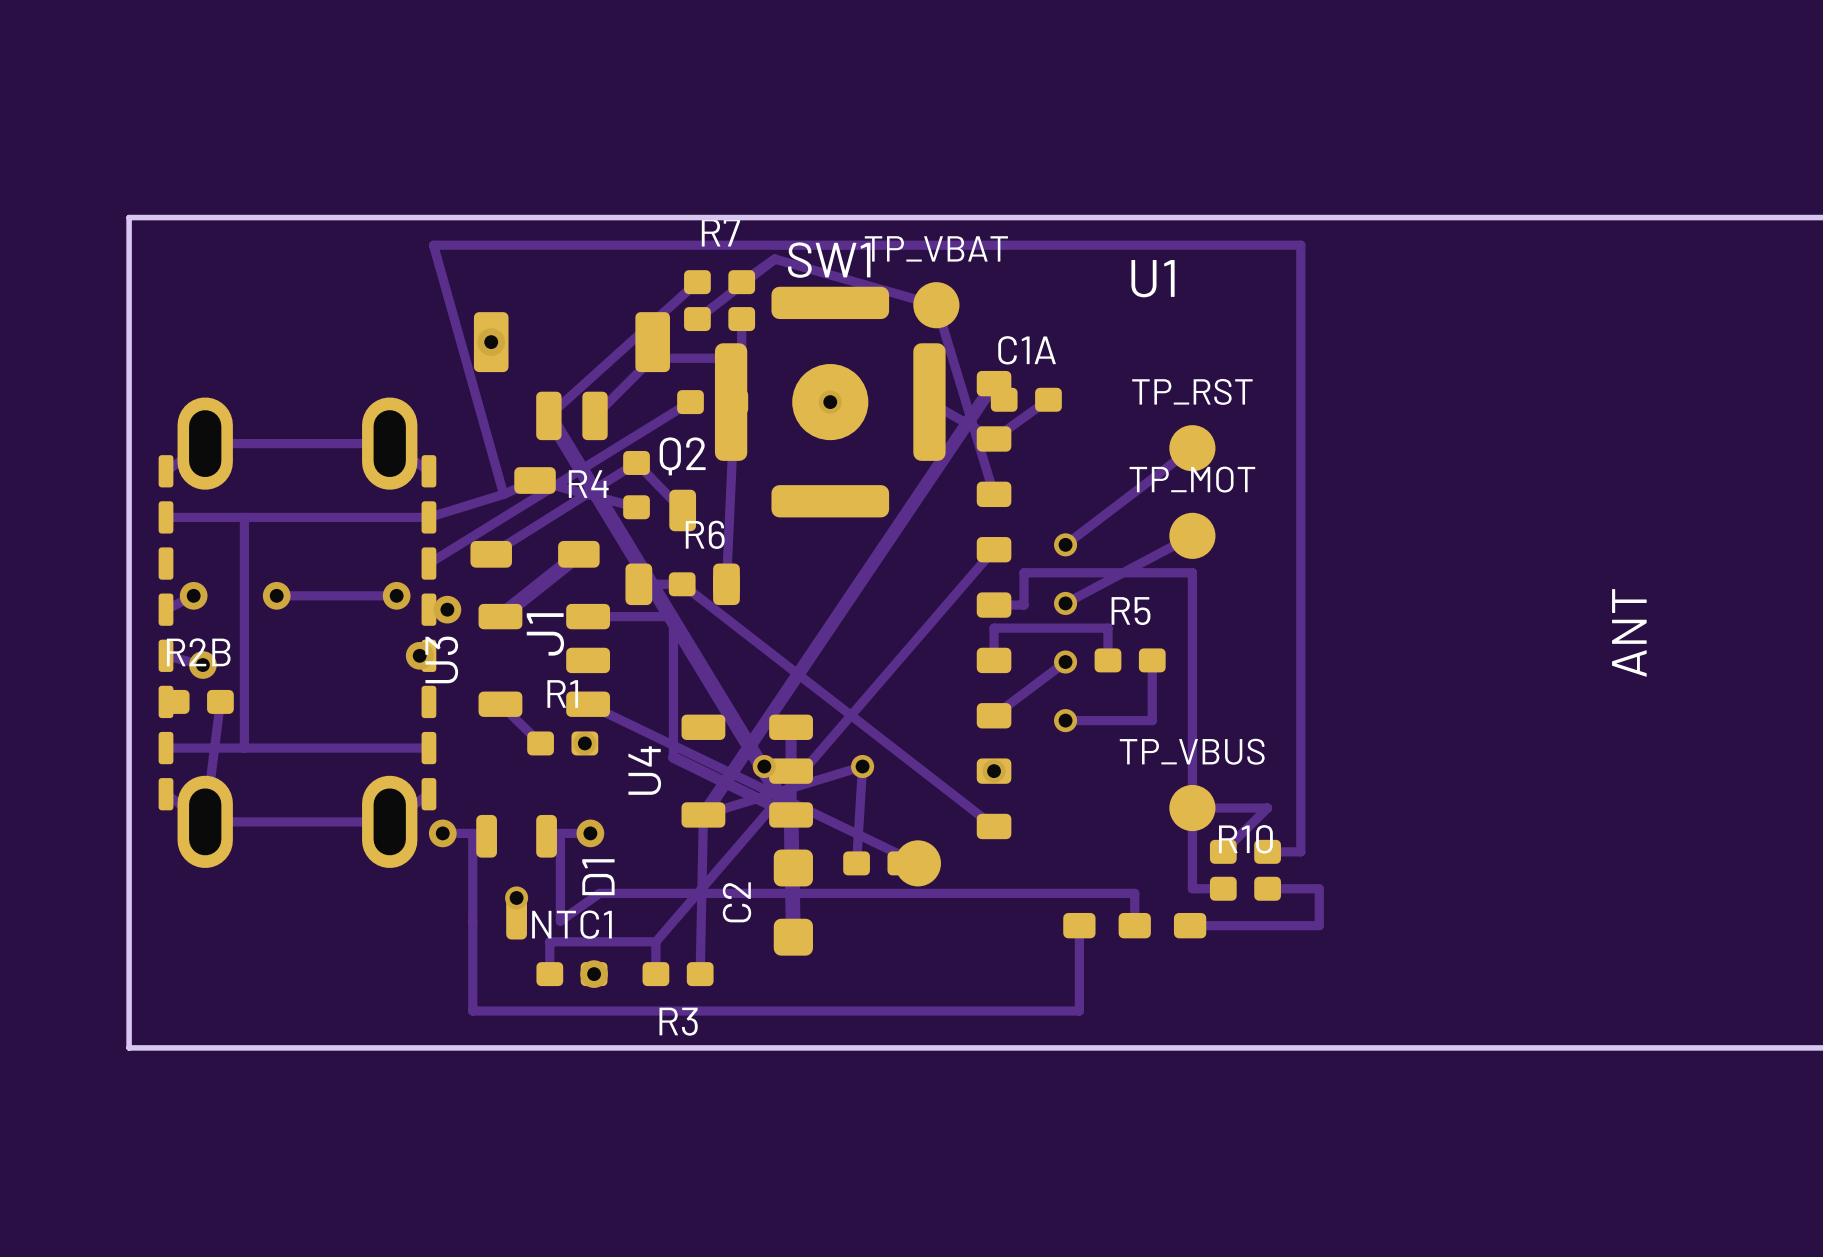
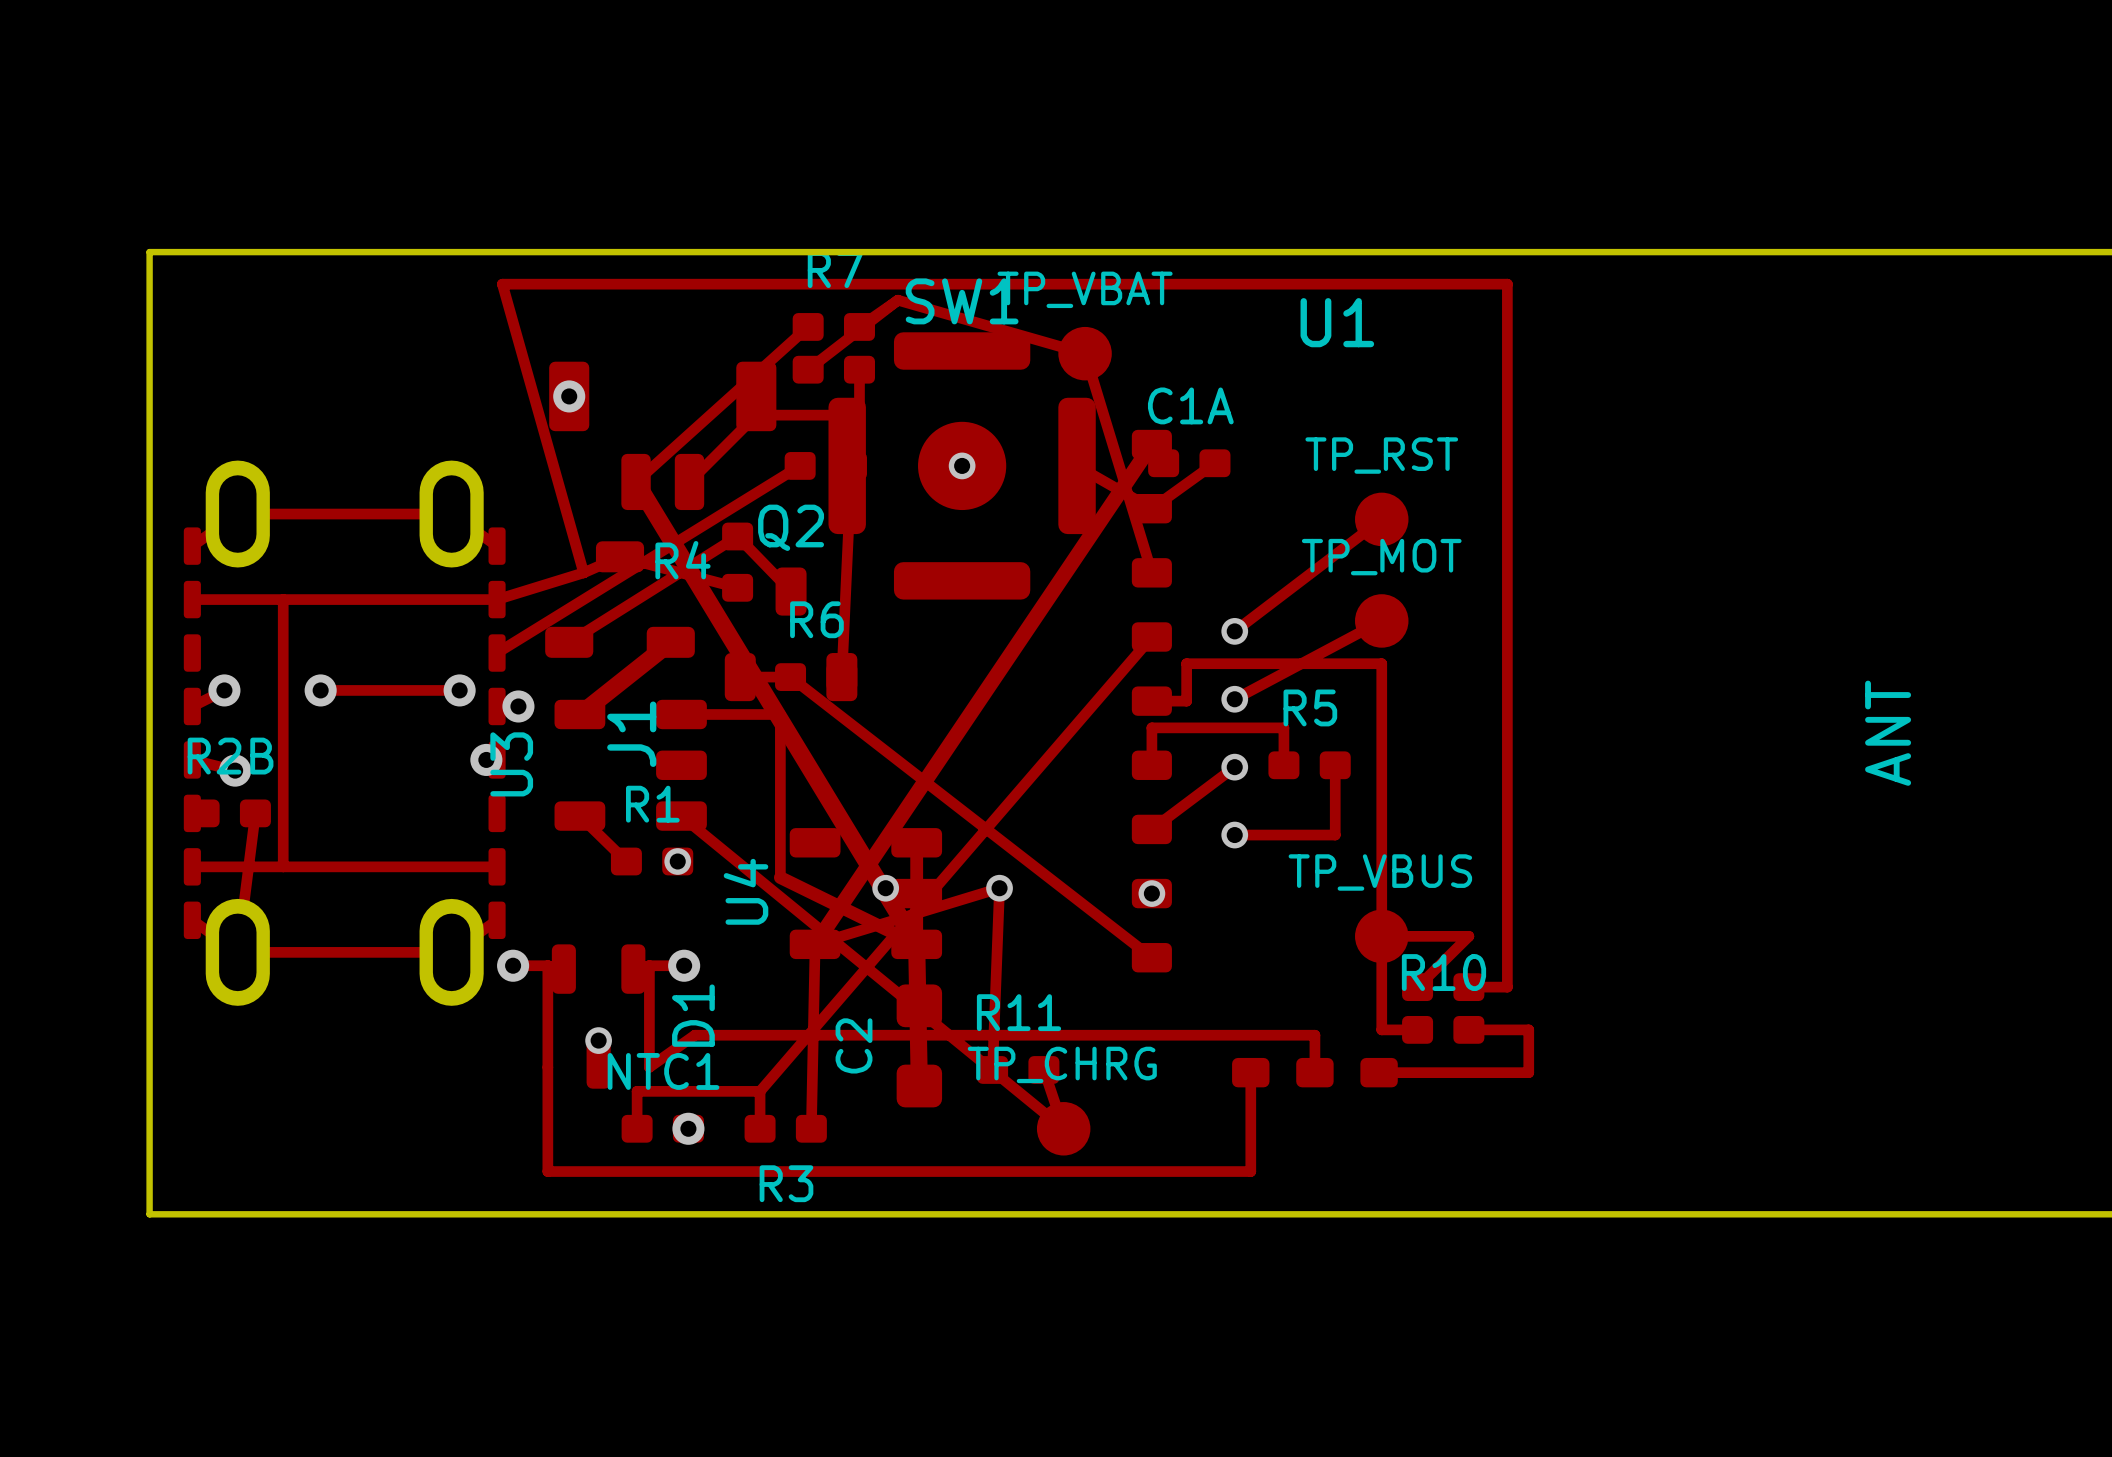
track: (588, 704) (917, 863) (900, 863) -> (681, 816) (1063, 1128) (1043, 1069)
track: (862, 766) (856, 863) -> (999, 888) (992, 1069)
part: (878, 863) -> none
part: (917, 863) -> none
R11: none -> (1018, 1069)
TP_CHRG: none -> (1063, 1128)

